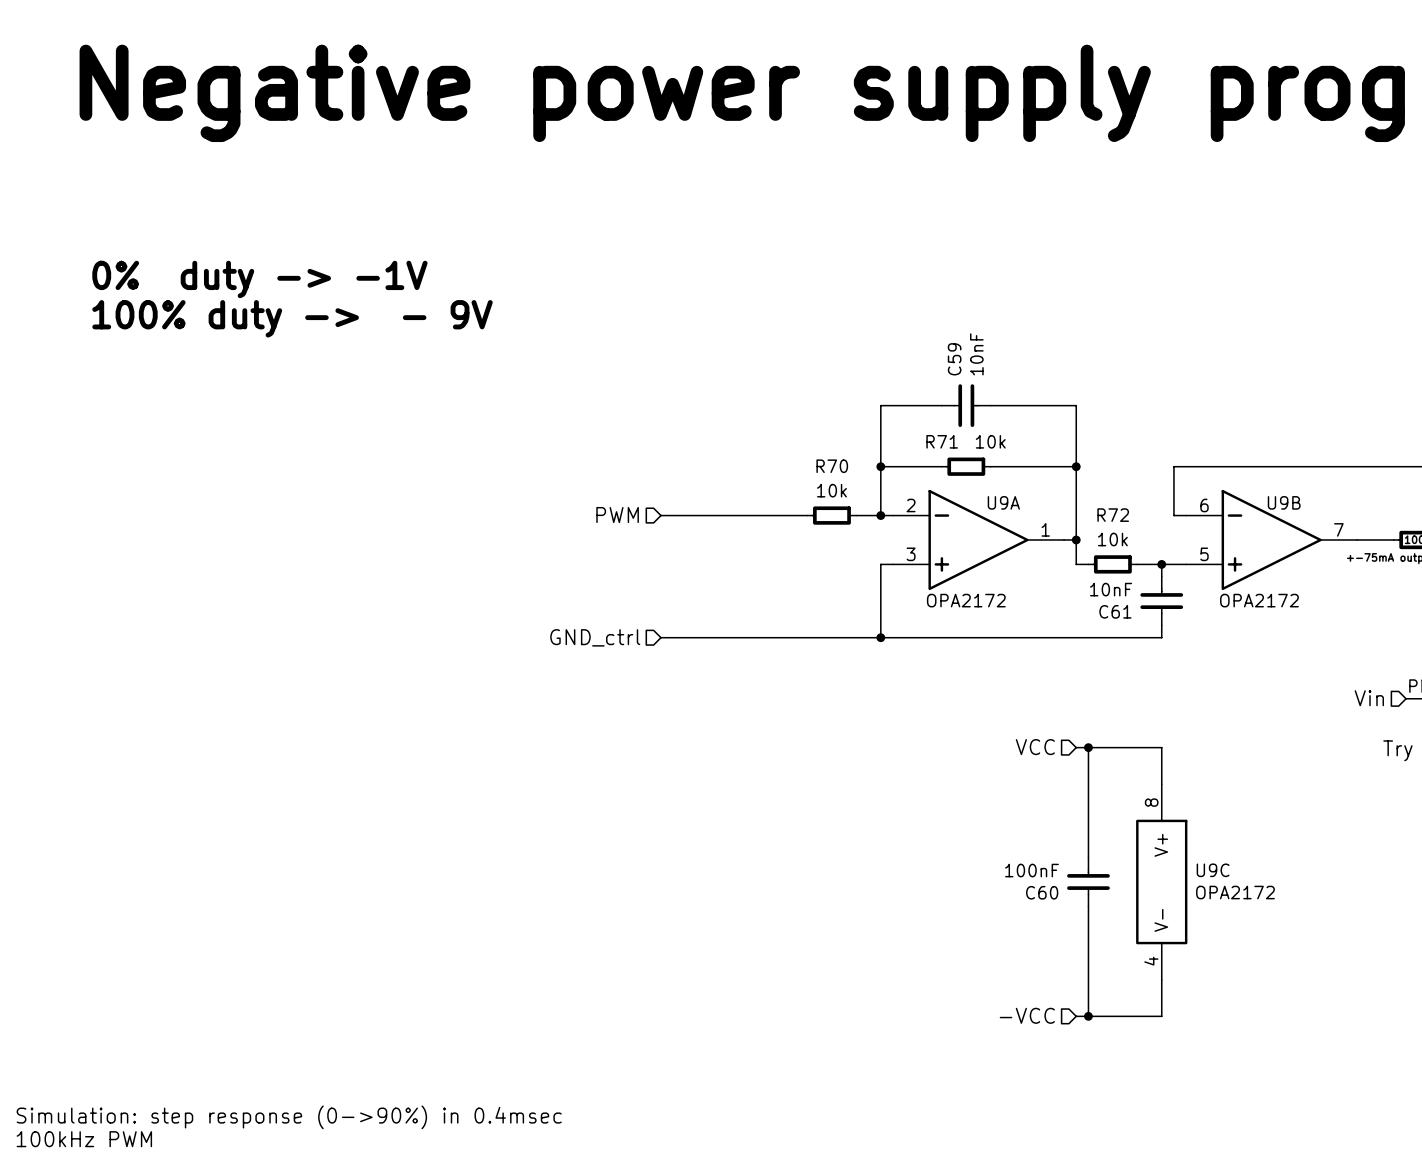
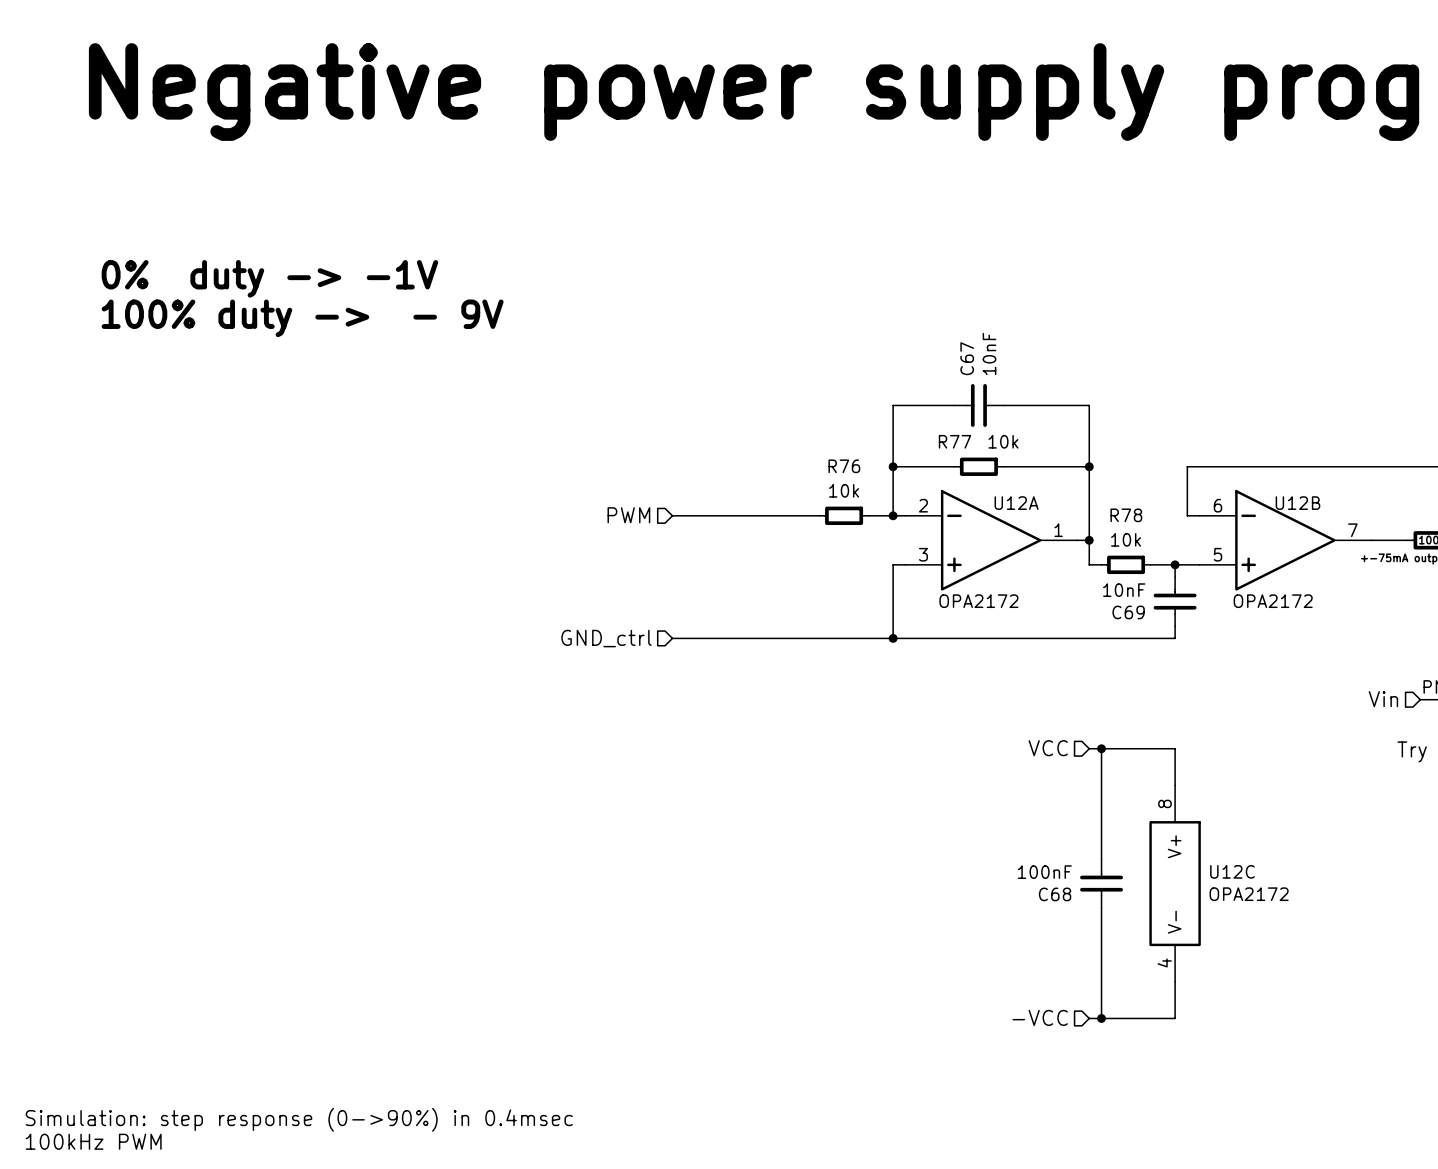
C59 name: C59 (954, 359) -> C67 (967, 358)
R71 name: R71 (942, 441) -> R77 (954, 441)
R70 name: R70 (832, 466) -> R76 (844, 466)
U9A name: U9A (1003, 502) -> U12A (1016, 503)
U9B name: U9B (1284, 502) -> U12B (1297, 503)
R72 name: R72 (1113, 515) -> R78 (1126, 515)
C61 name: C61 (1115, 611) -> C69 (1128, 612)
U9C name: U9C (1213, 870) -> U12C (1232, 871)
C60 name: C60 (1042, 892) -> C68 (1055, 894)

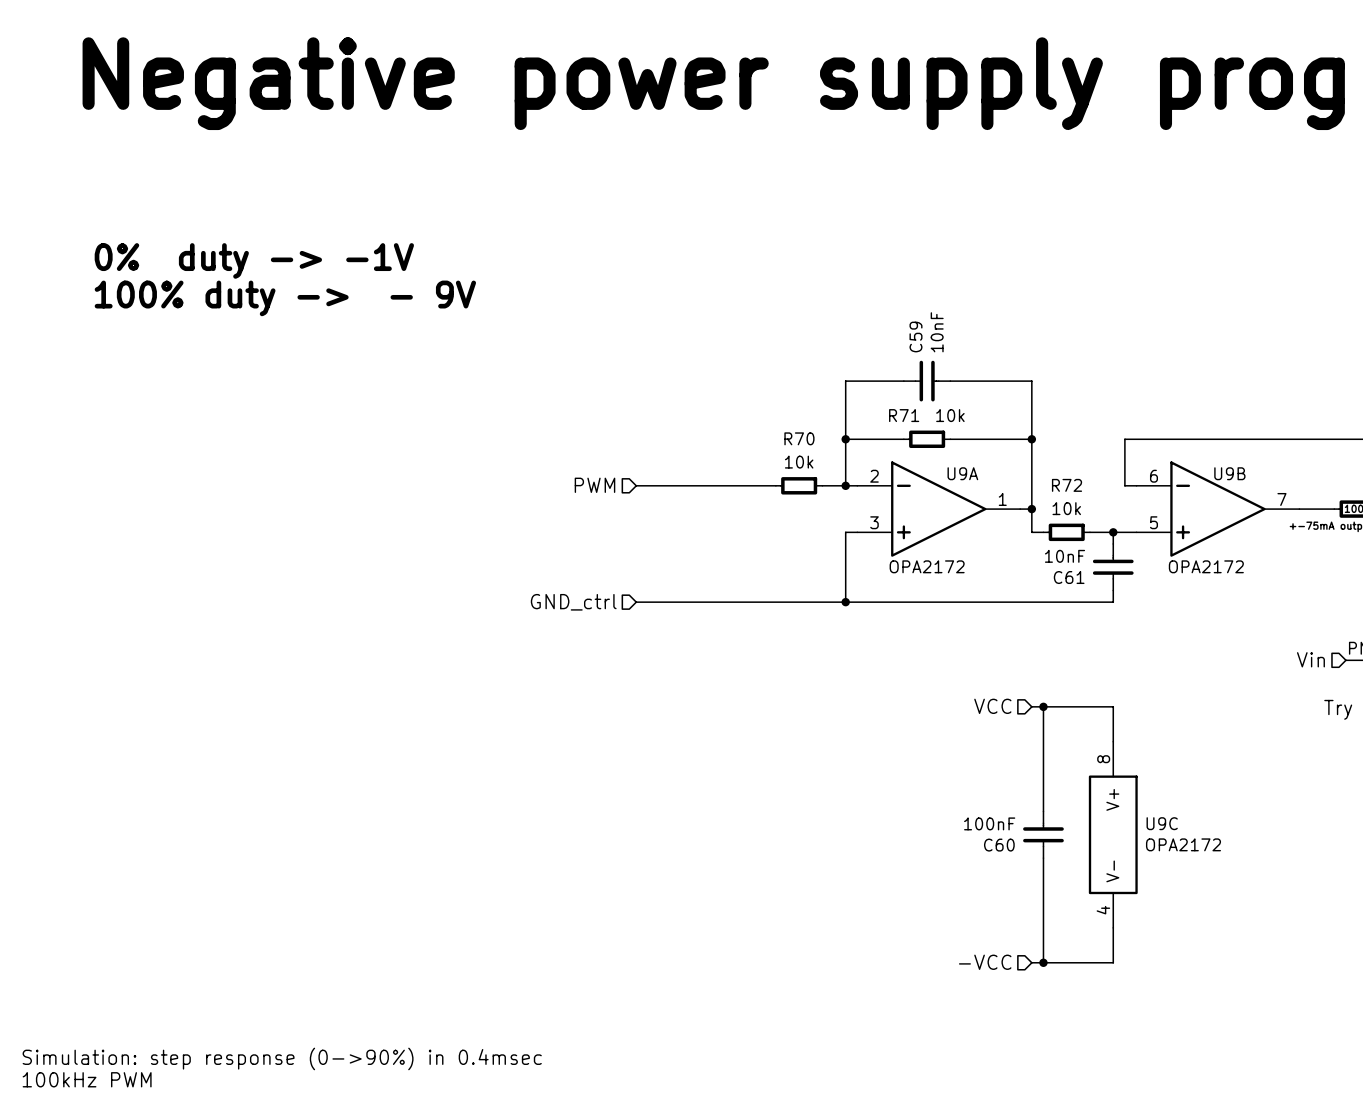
C67 name: C67 (967, 358) -> C59 (915, 337)
R77 name: R77 (954, 441) -> R71 (904, 415)
R76 name: R76 (844, 466) -> R70 (799, 438)
U12A name: U12A (1016, 503) -> U9A (962, 473)
U12B name: U12B (1297, 503) -> U9B (1229, 473)
R78 name: R78 (1126, 515) -> R72 (1067, 485)
C69 name: C69 (1128, 612) -> C61 (1069, 577)
U12C name: U12C (1232, 871) -> U9C (1162, 823)
C68 name: C68 (1055, 894) -> C60 (999, 845)

